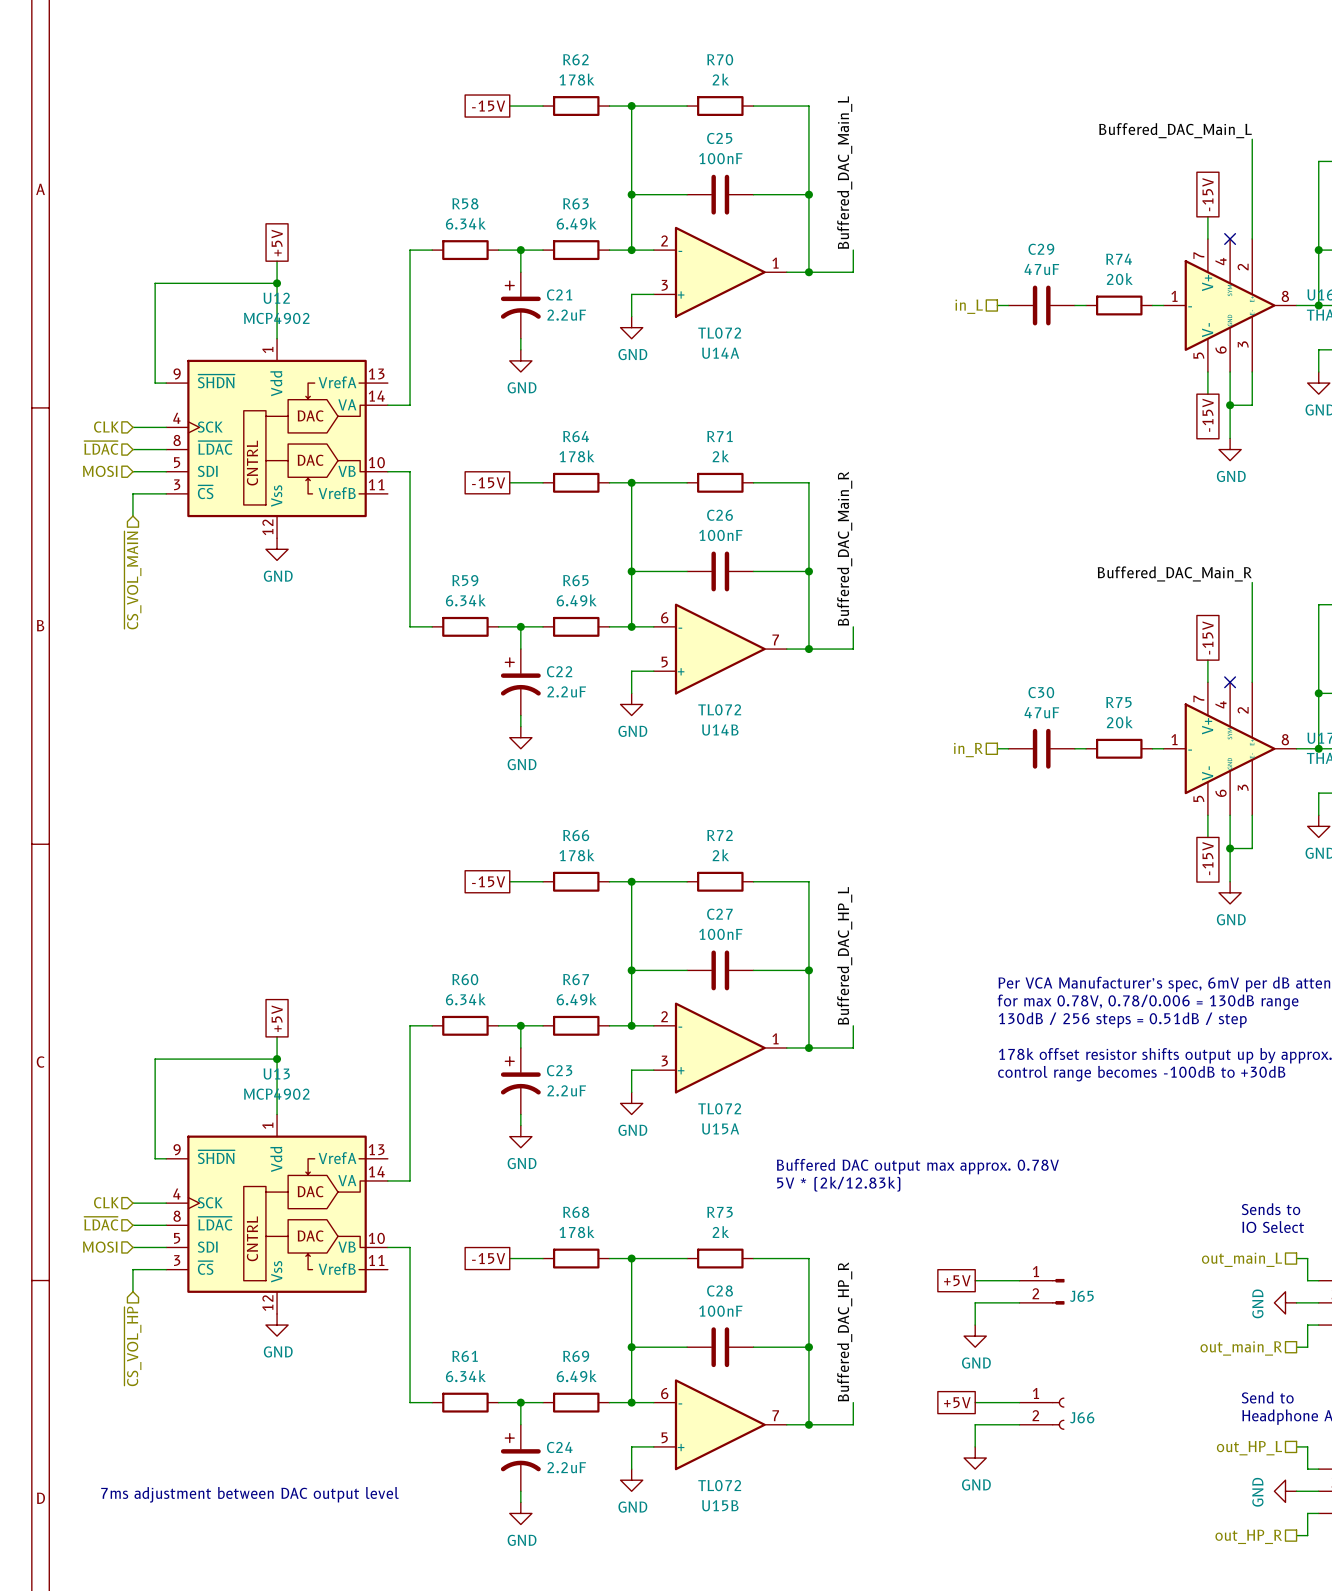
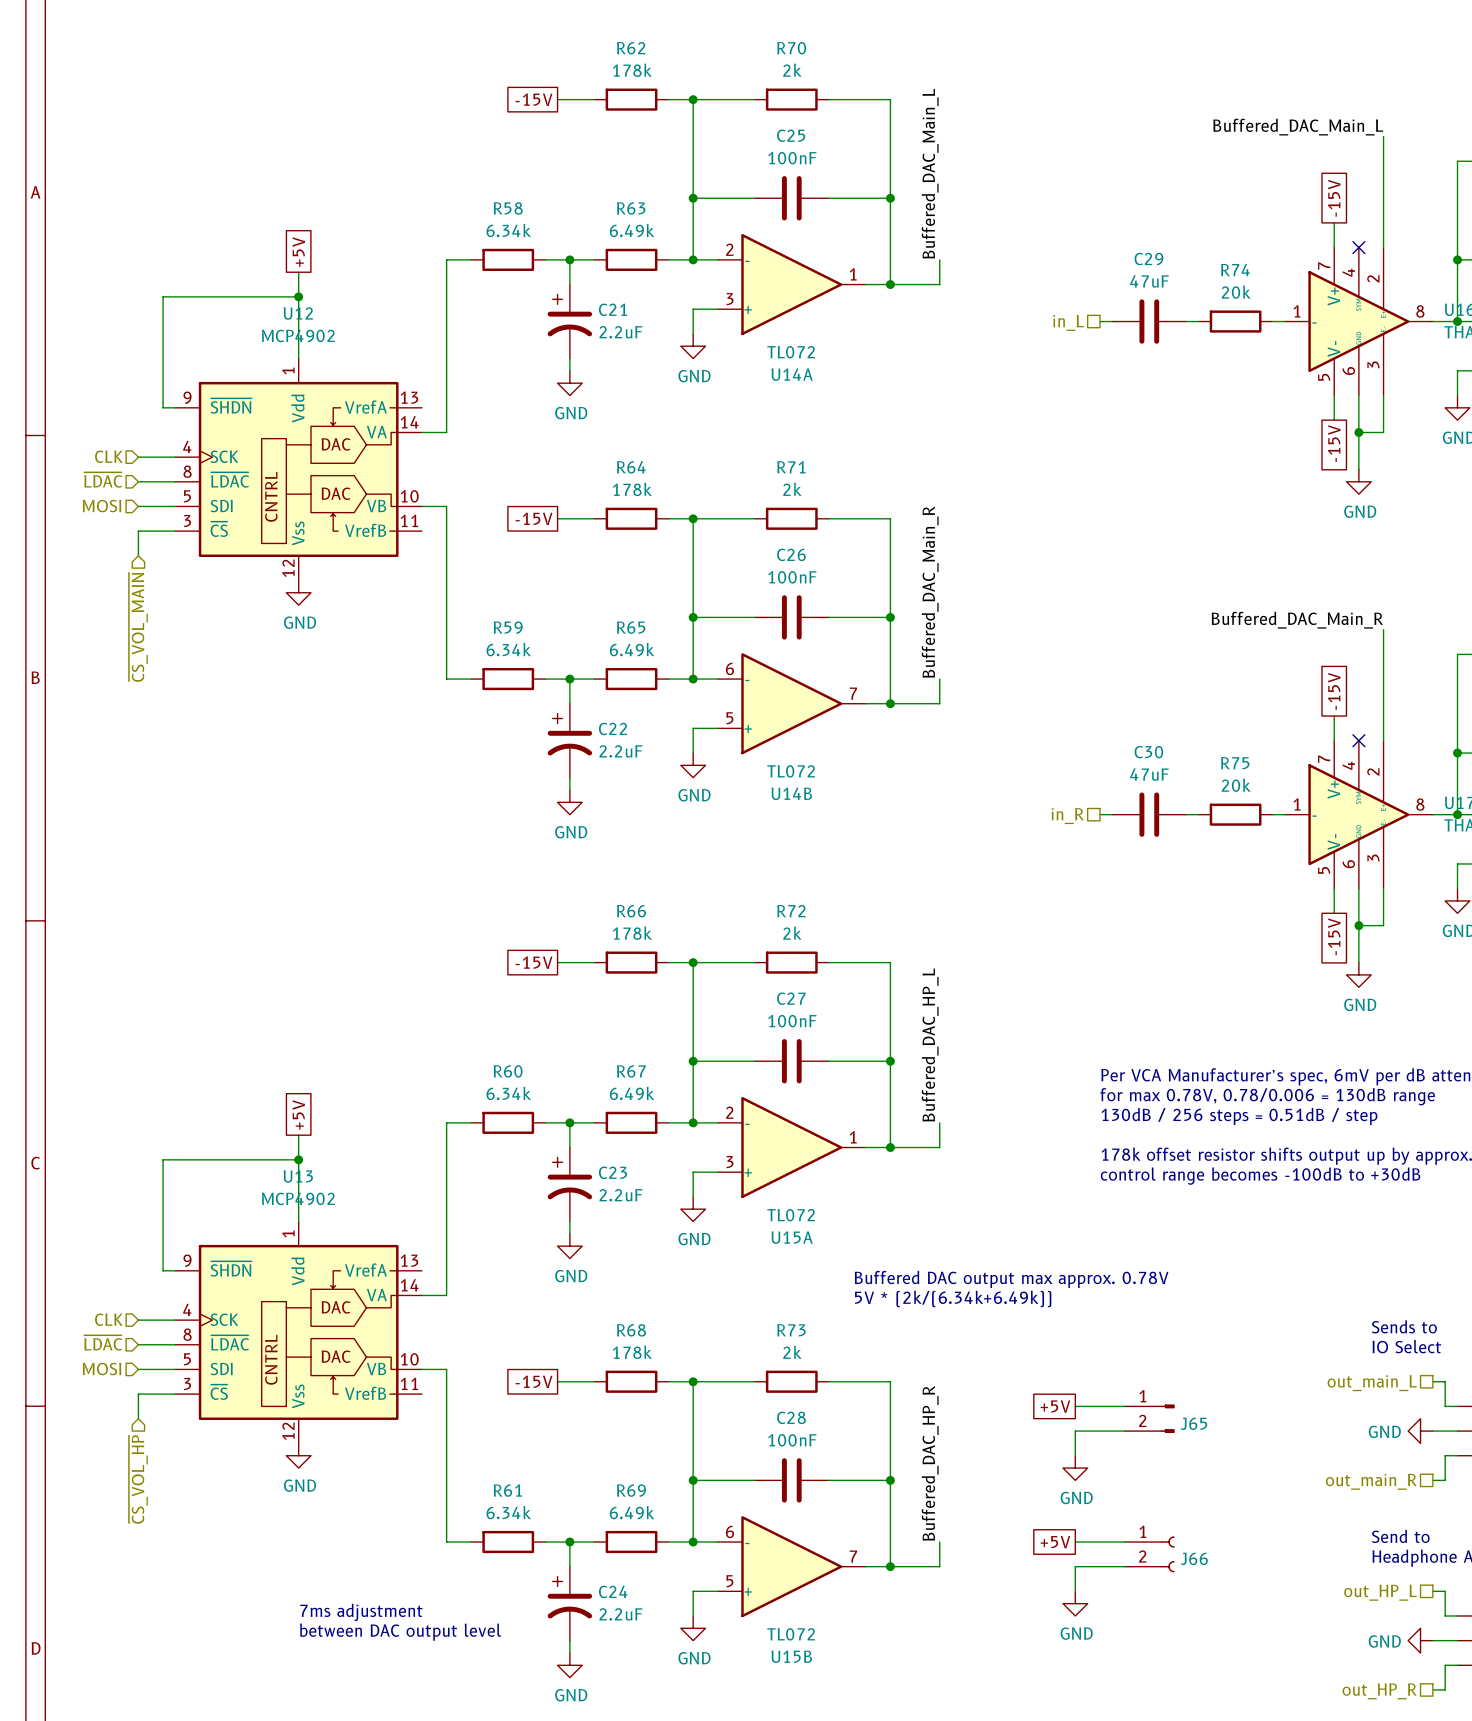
text: 5V * (2k/12.83k) (838, 1184) -> 5V * (2k/(6.34k+6.49k)) (953, 1298)
power symbol text rotation: 0° (1257, 1303) -> 90° clockwise (1384, 1431)
text: none -> 7ms adjustment (361, 1612)
power symbol text rotation: 0° (1257, 1492) -> 90° clockwise (1384, 1641)
text: 7ms adjustment between DAC output level (249, 1494) -> between DAC output level (400, 1632)

